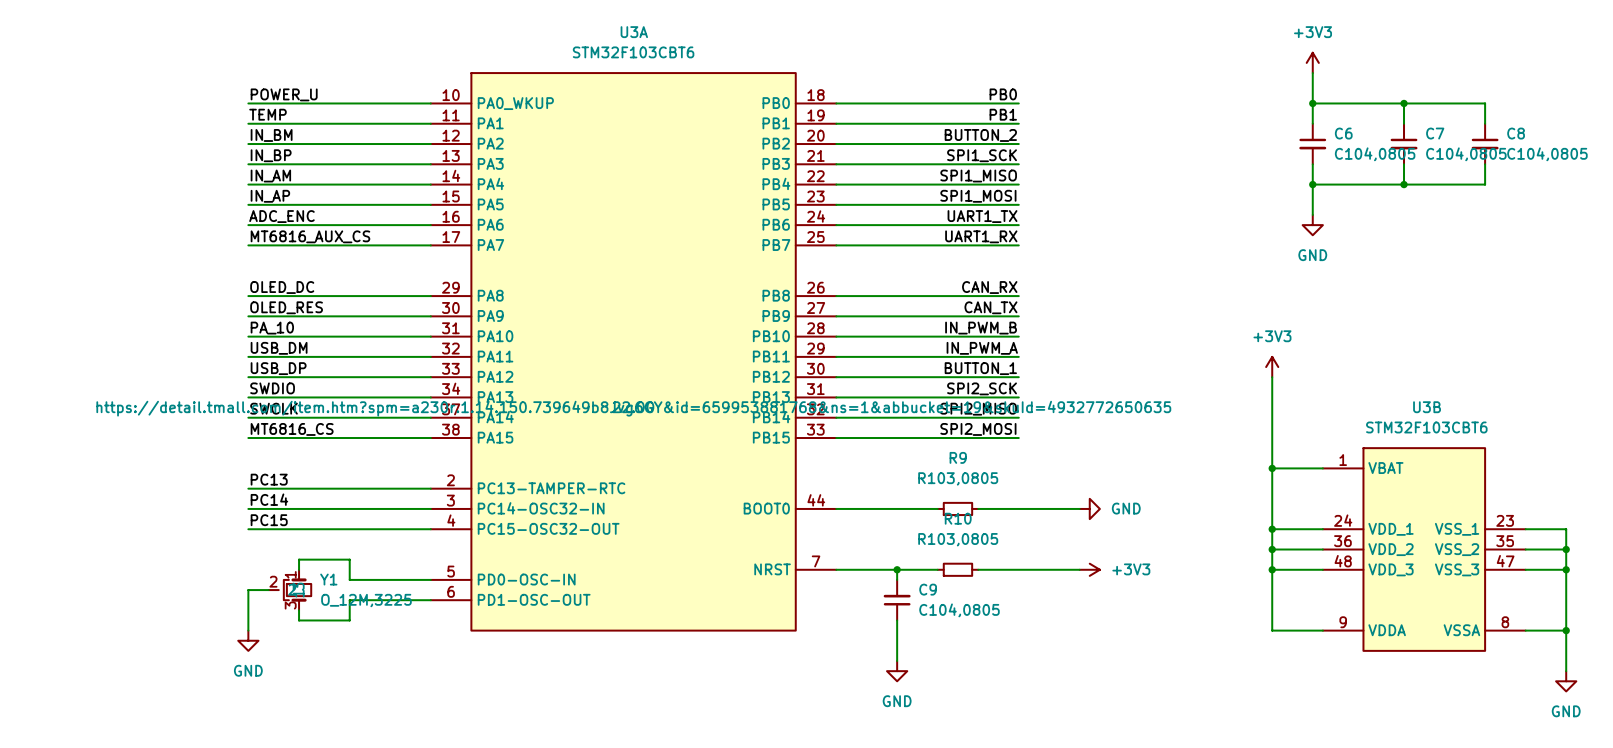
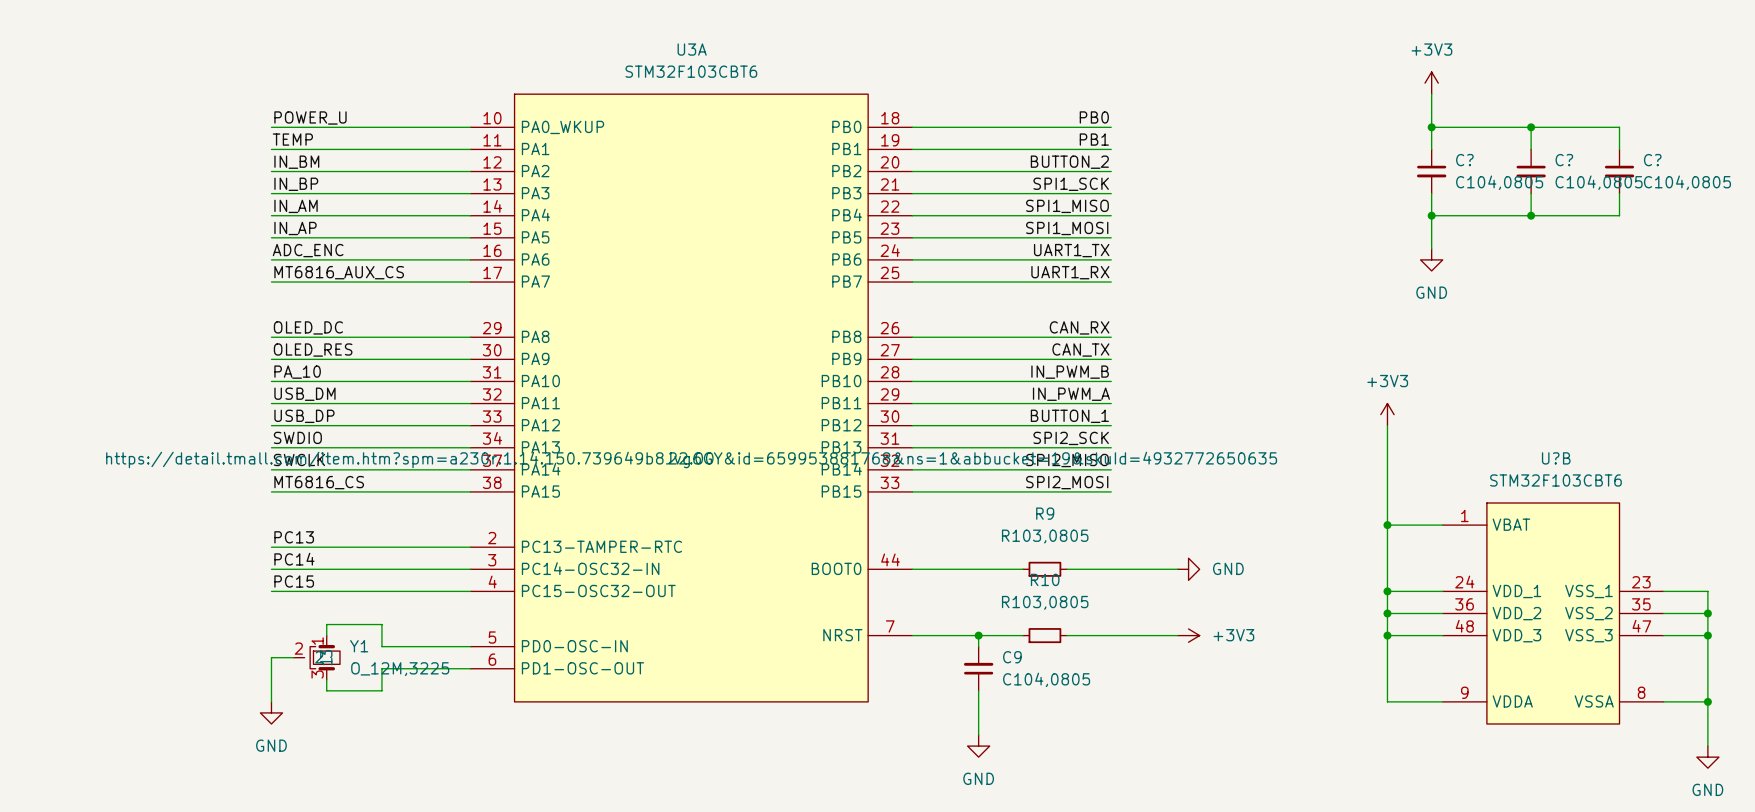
C6 name: C6 (1343, 133) -> C? (1464, 160)
C7 name: C7 (1435, 133) -> C? (1564, 160)
C8 name: C8 (1516, 133) -> C? (1652, 160)
U3B name: U3B (1427, 407) -> U?B (1556, 458)

